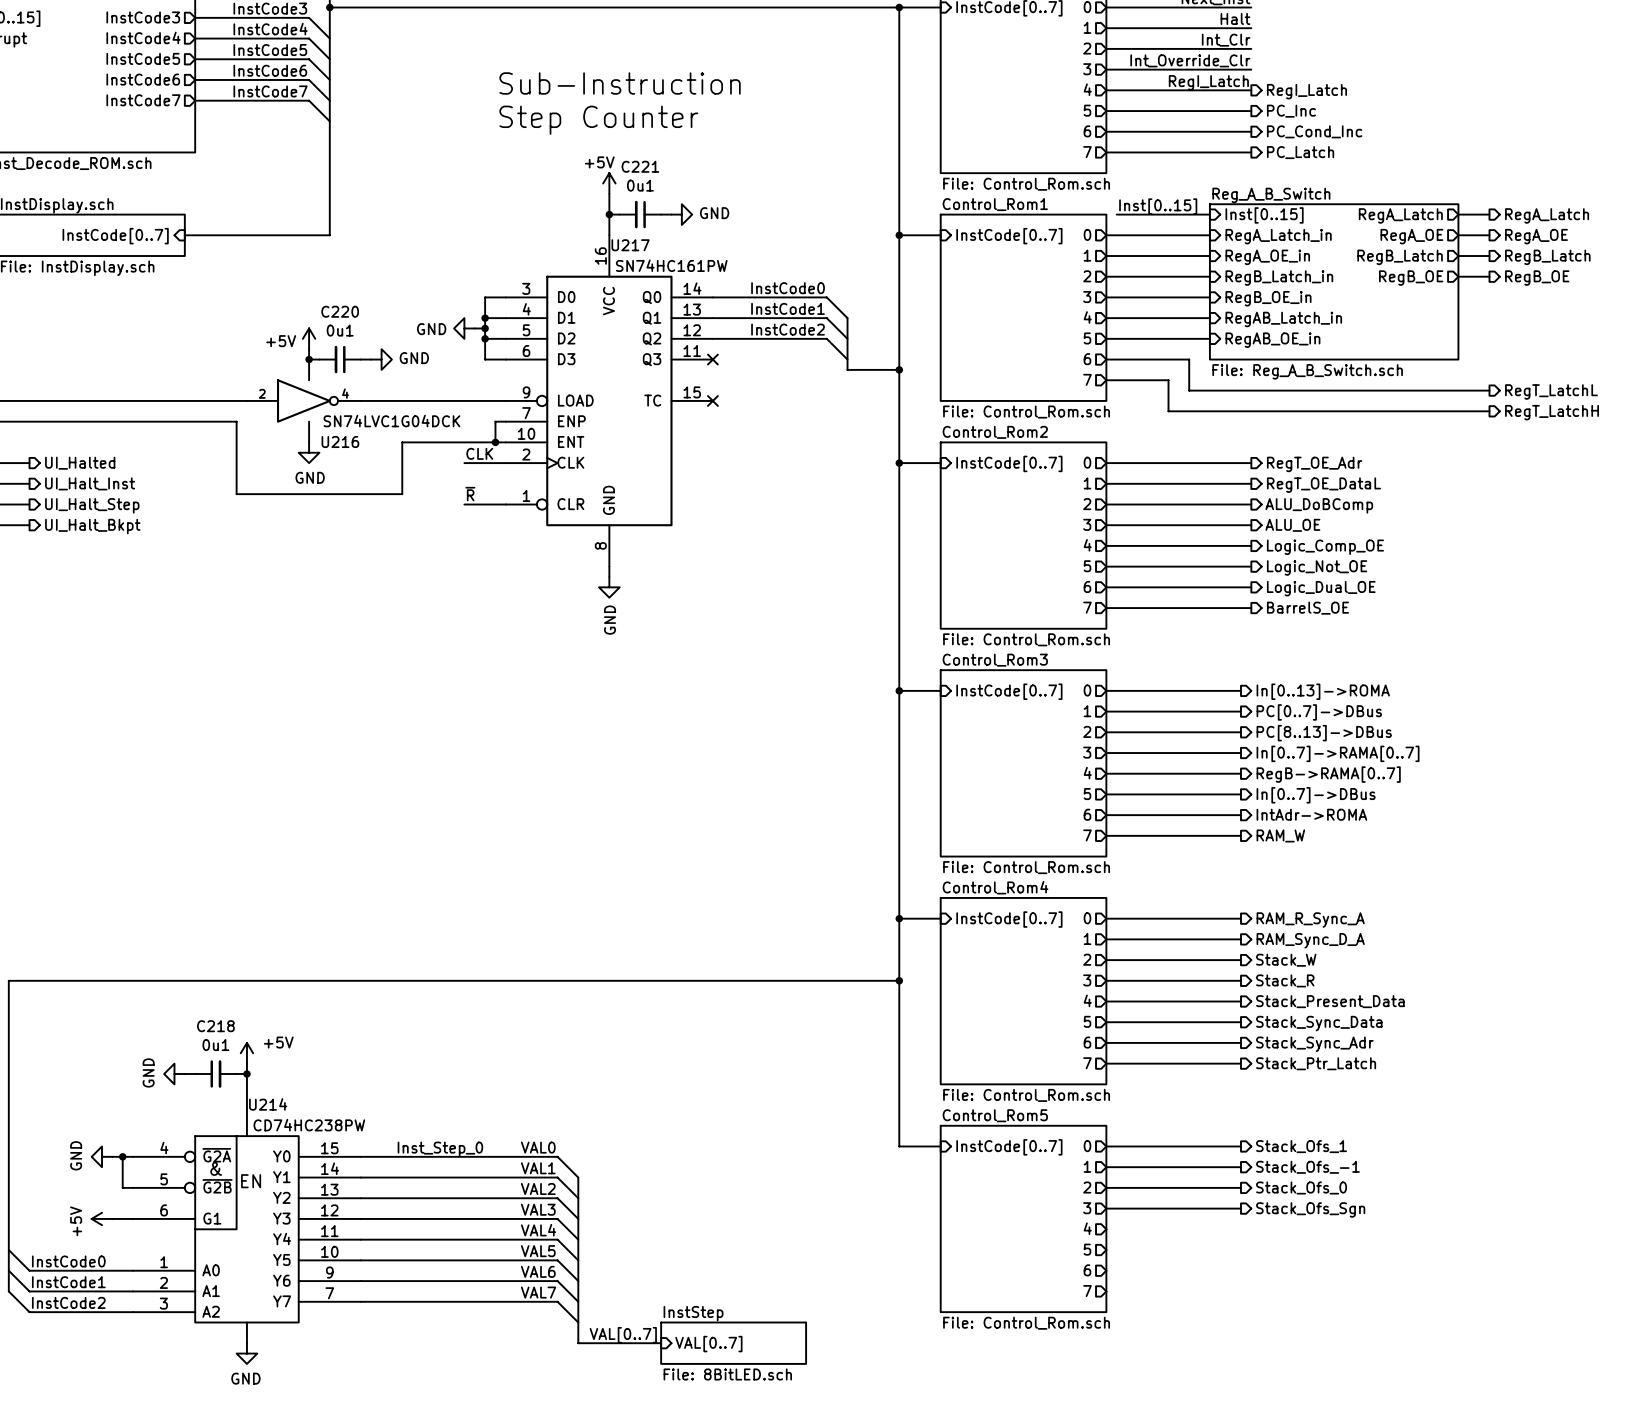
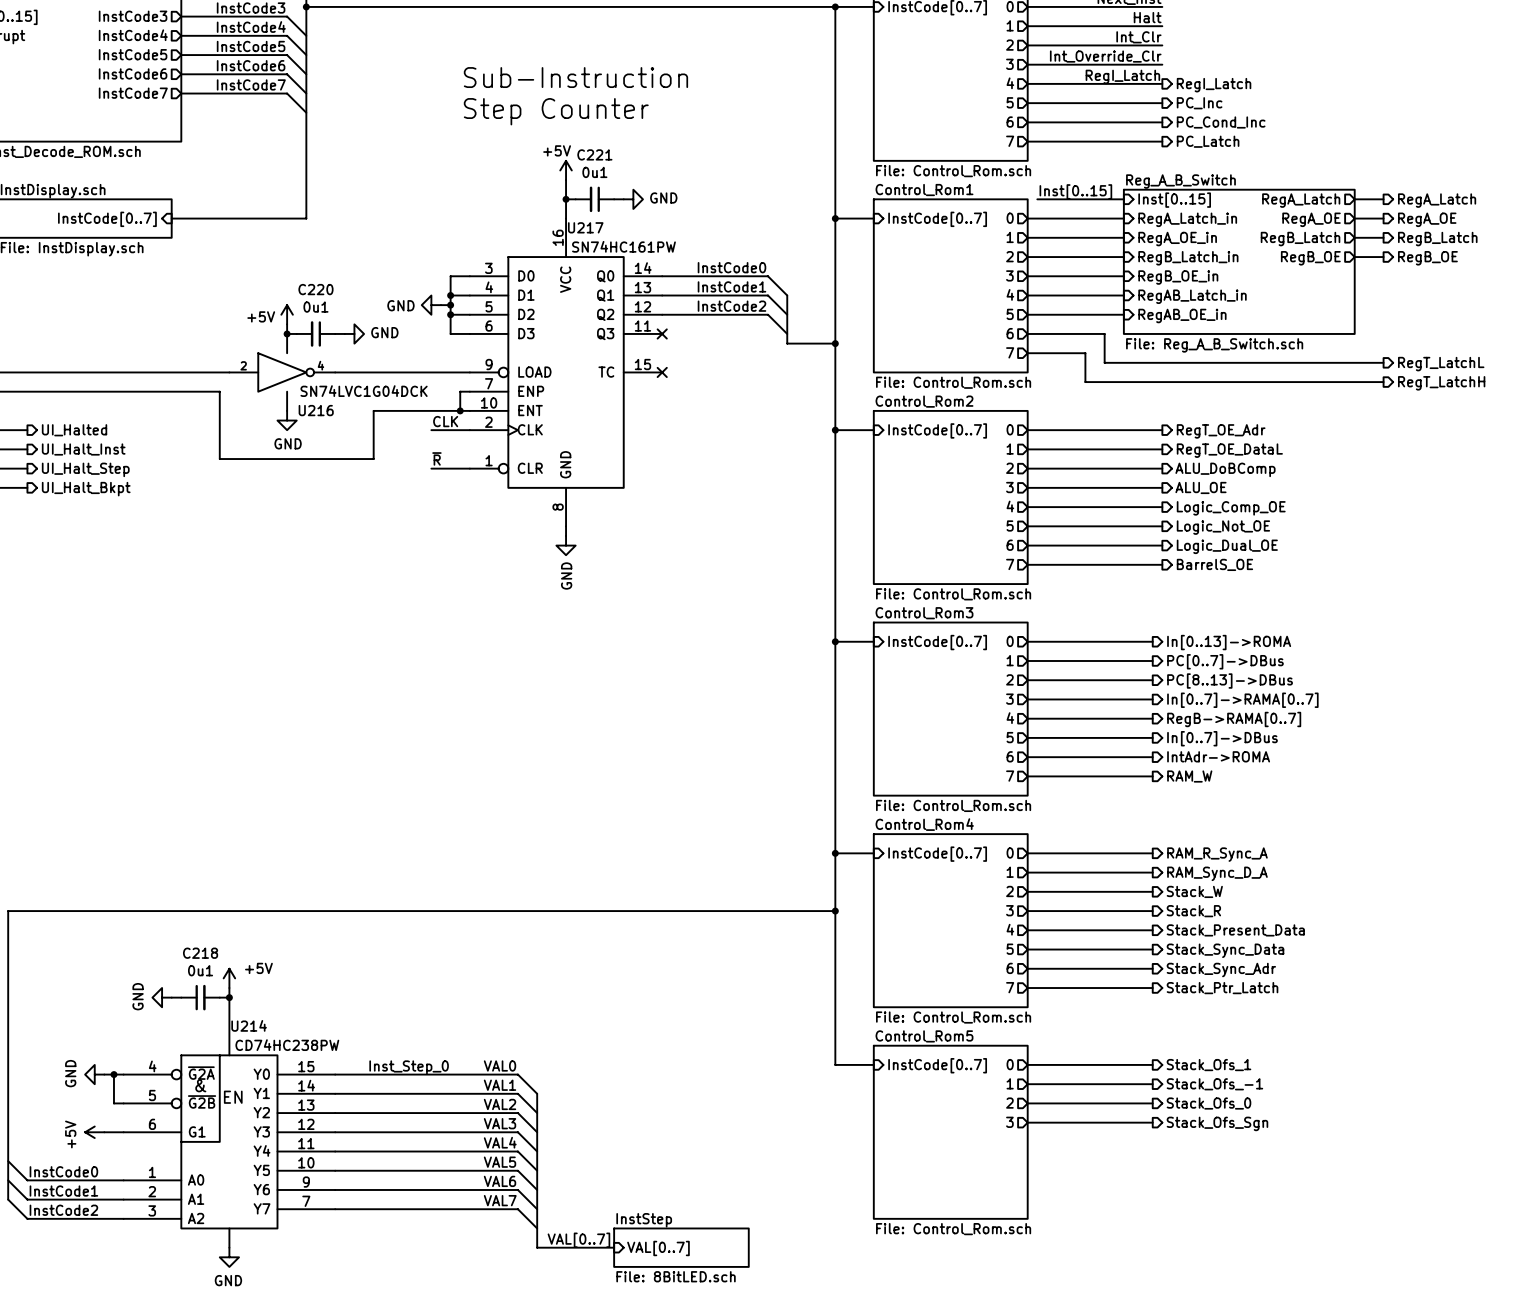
sheet pin: 4 (1087, 1228) -> none
sheet pin: 5 (1087, 1249) -> none
sheet pin: 6 (1087, 1270) -> none
sheet pin: 7 (1087, 1291) -> none

